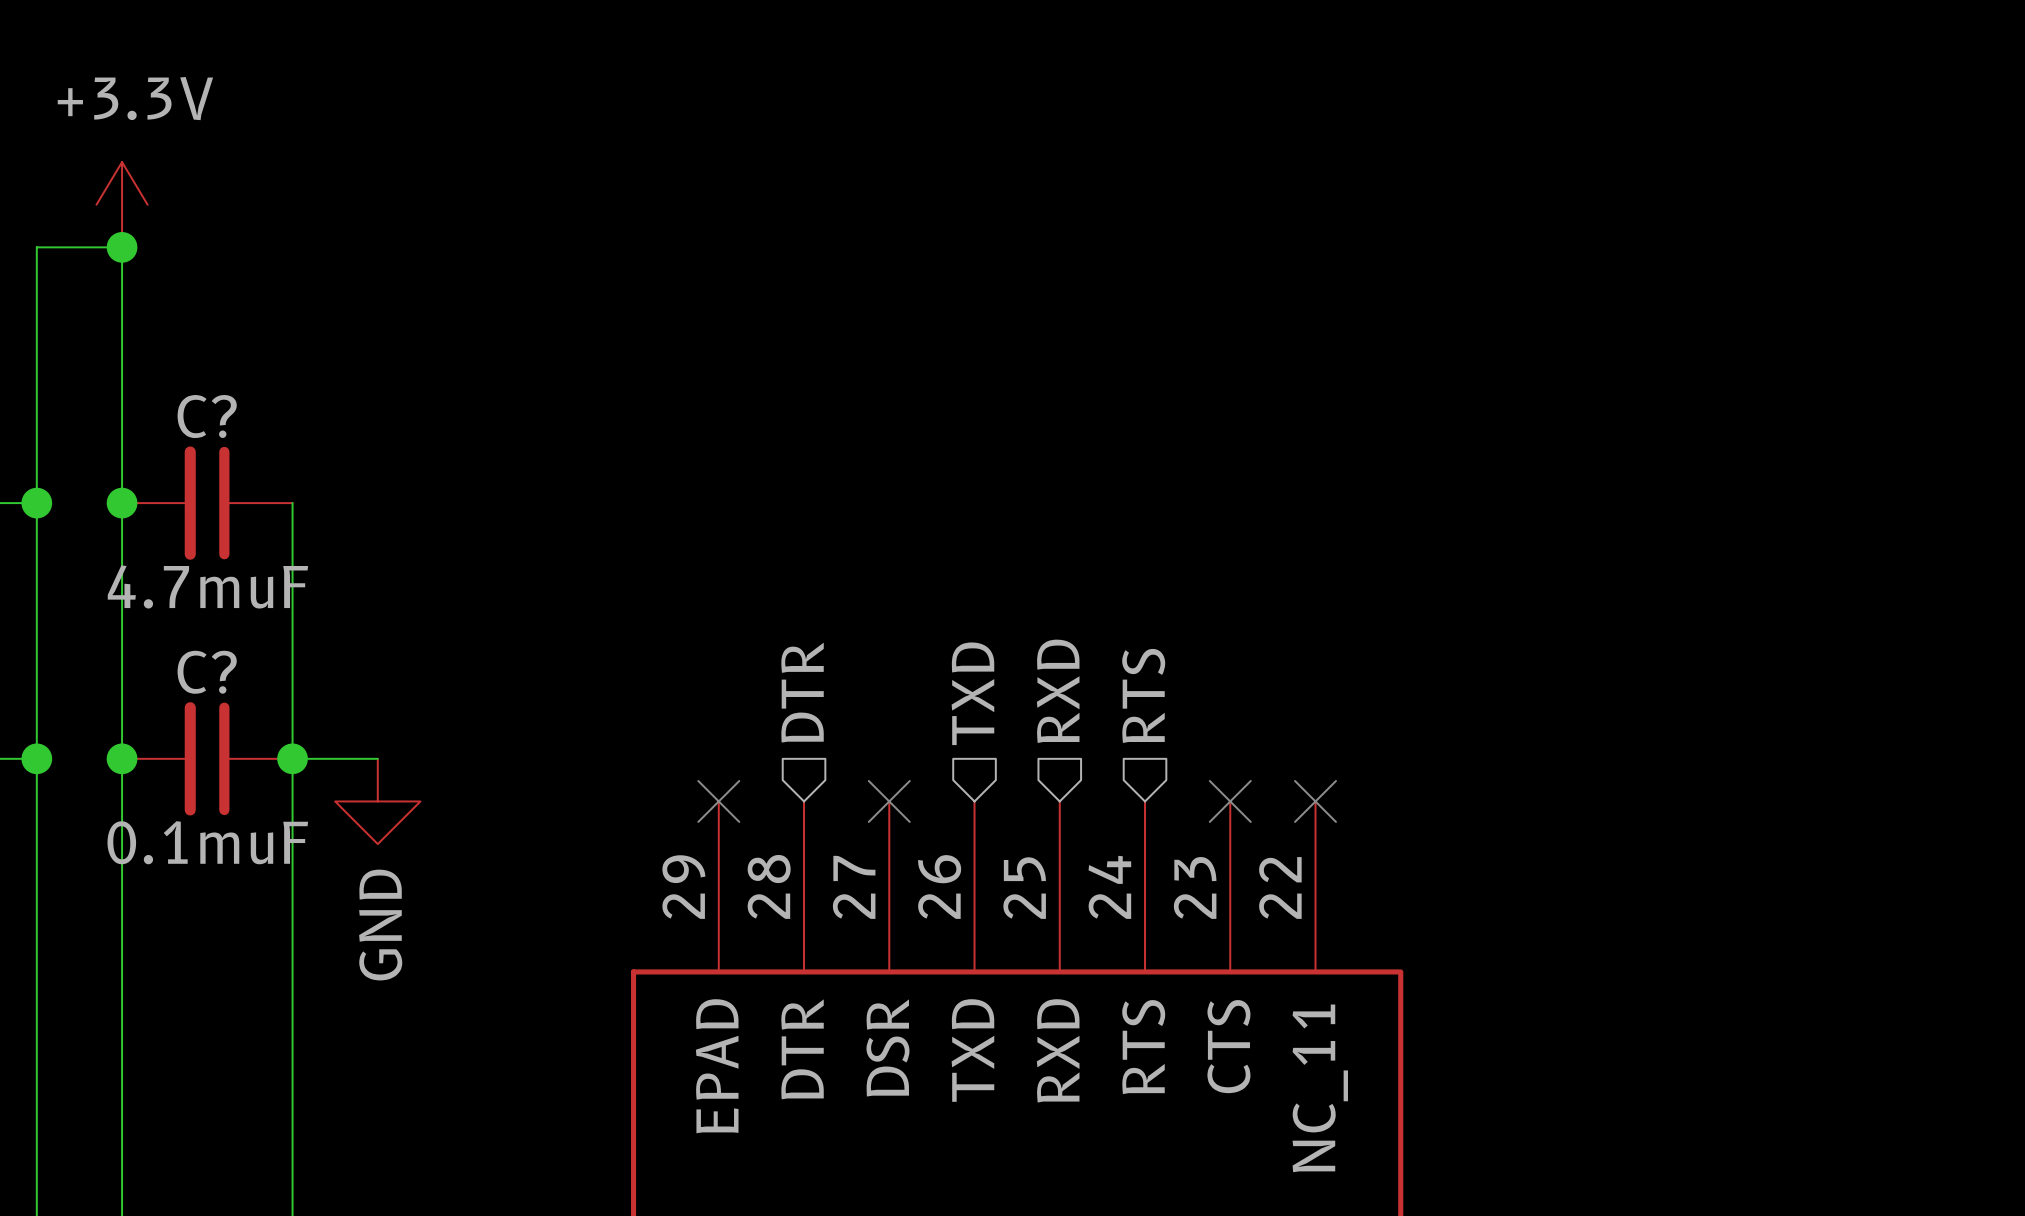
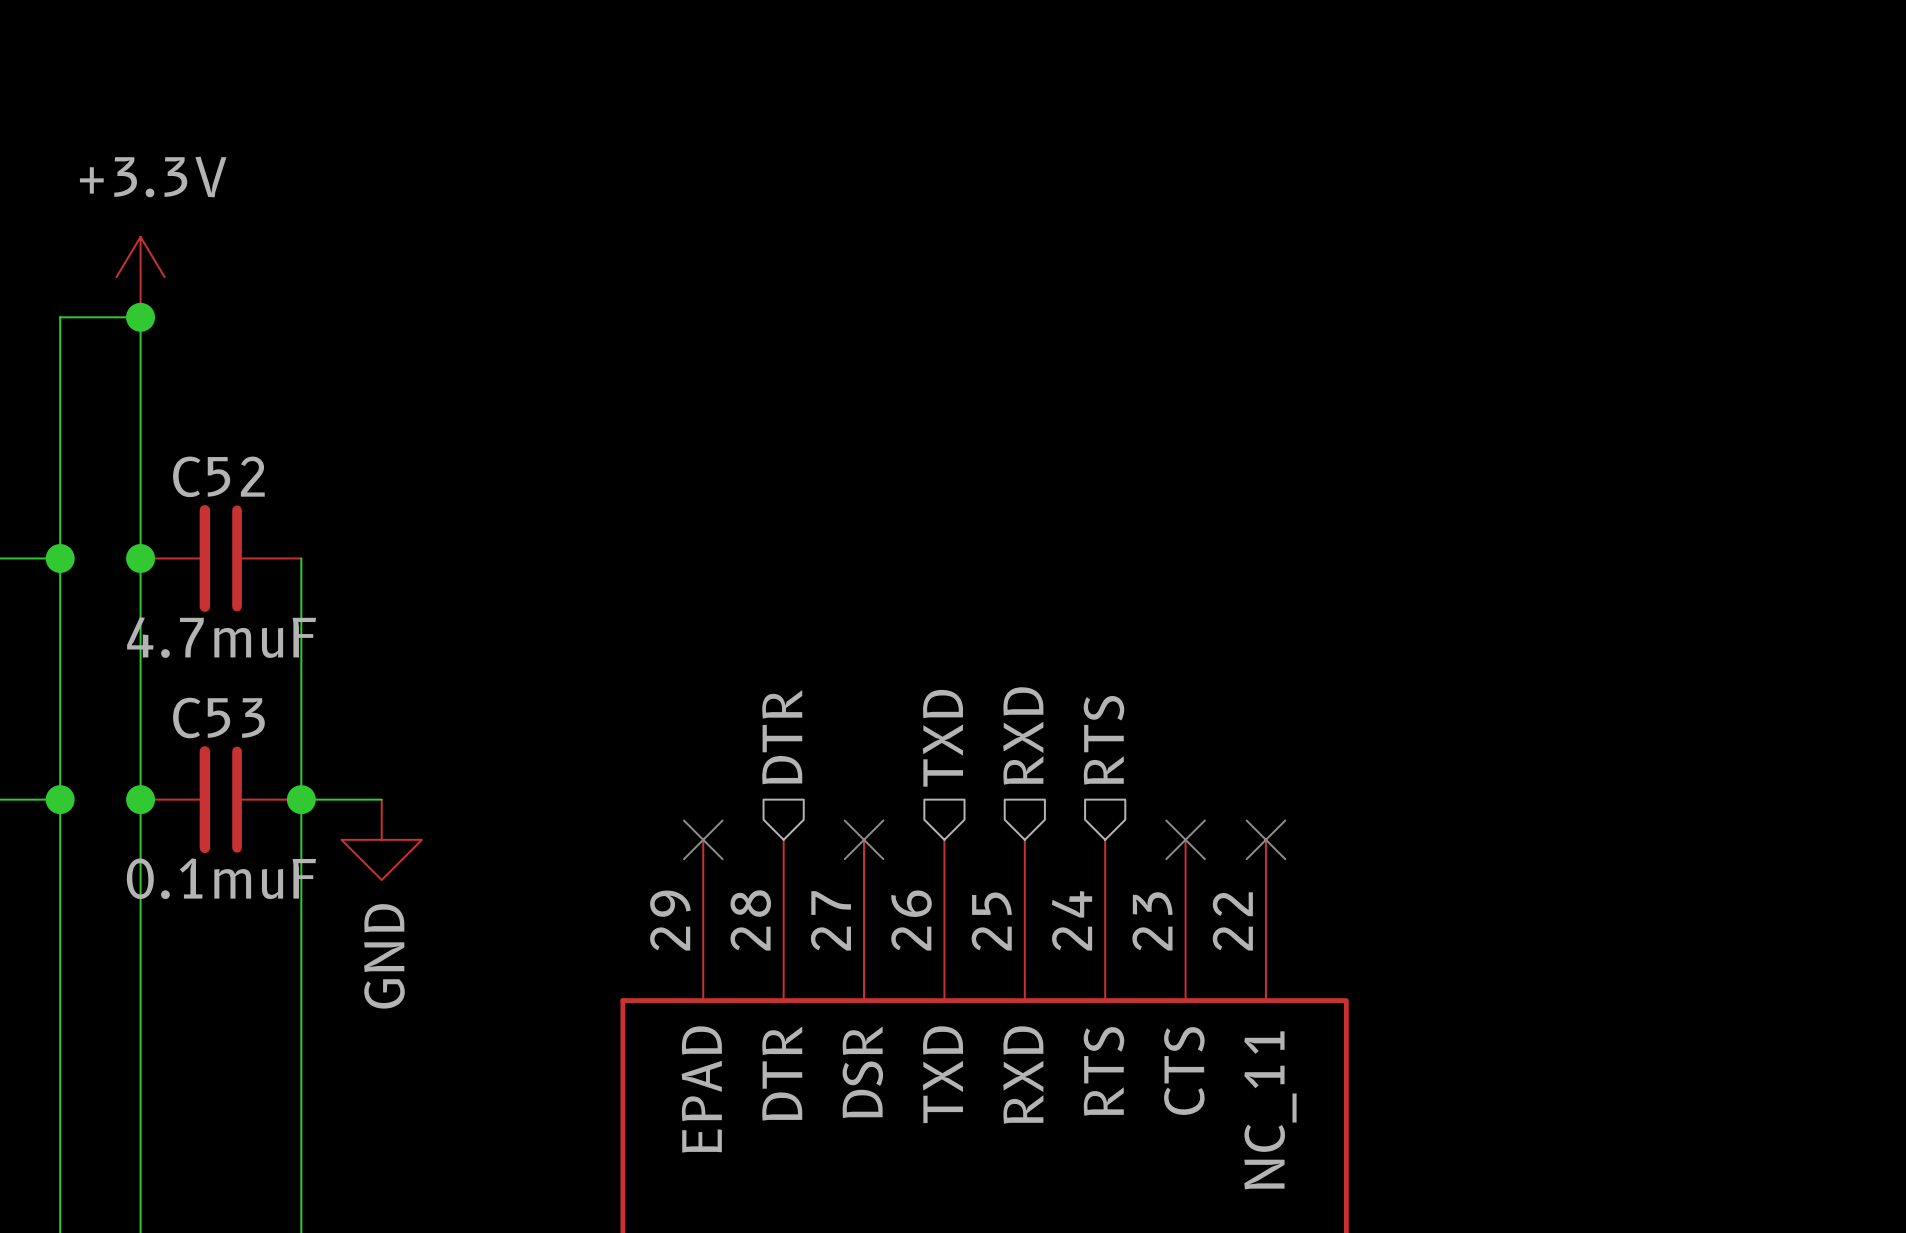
C? name: C? (207, 416) -> C52 (218, 476)
C? name: C? (207, 672) -> C53 (218, 718)

